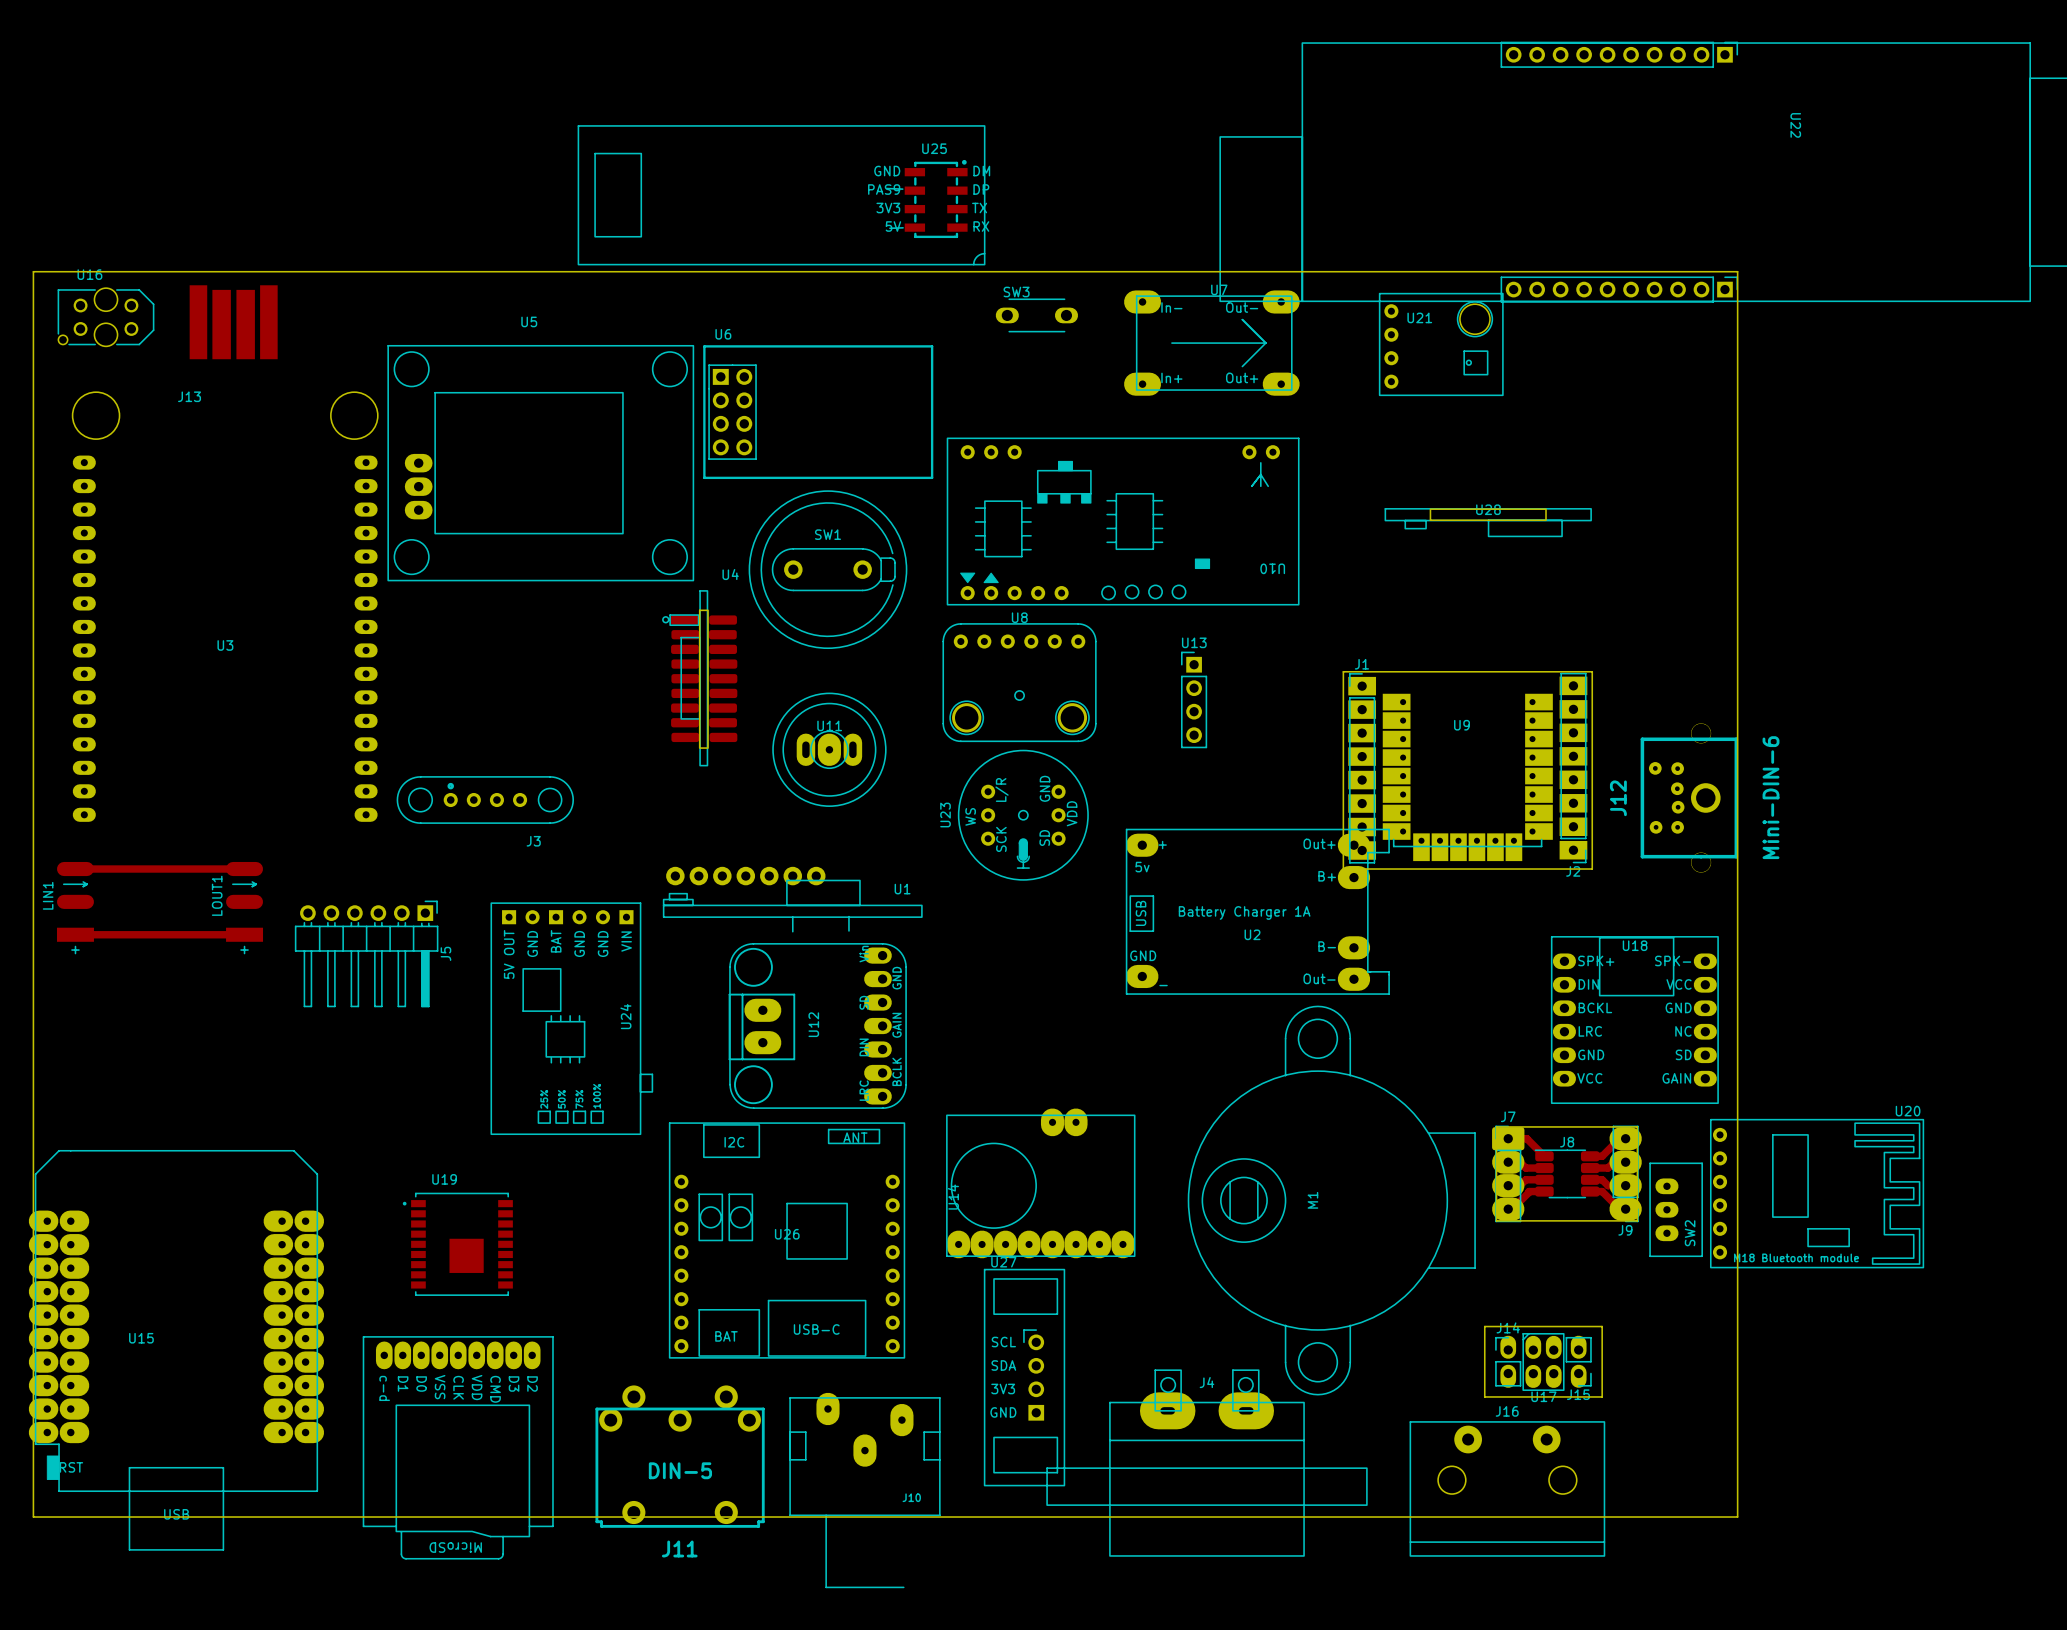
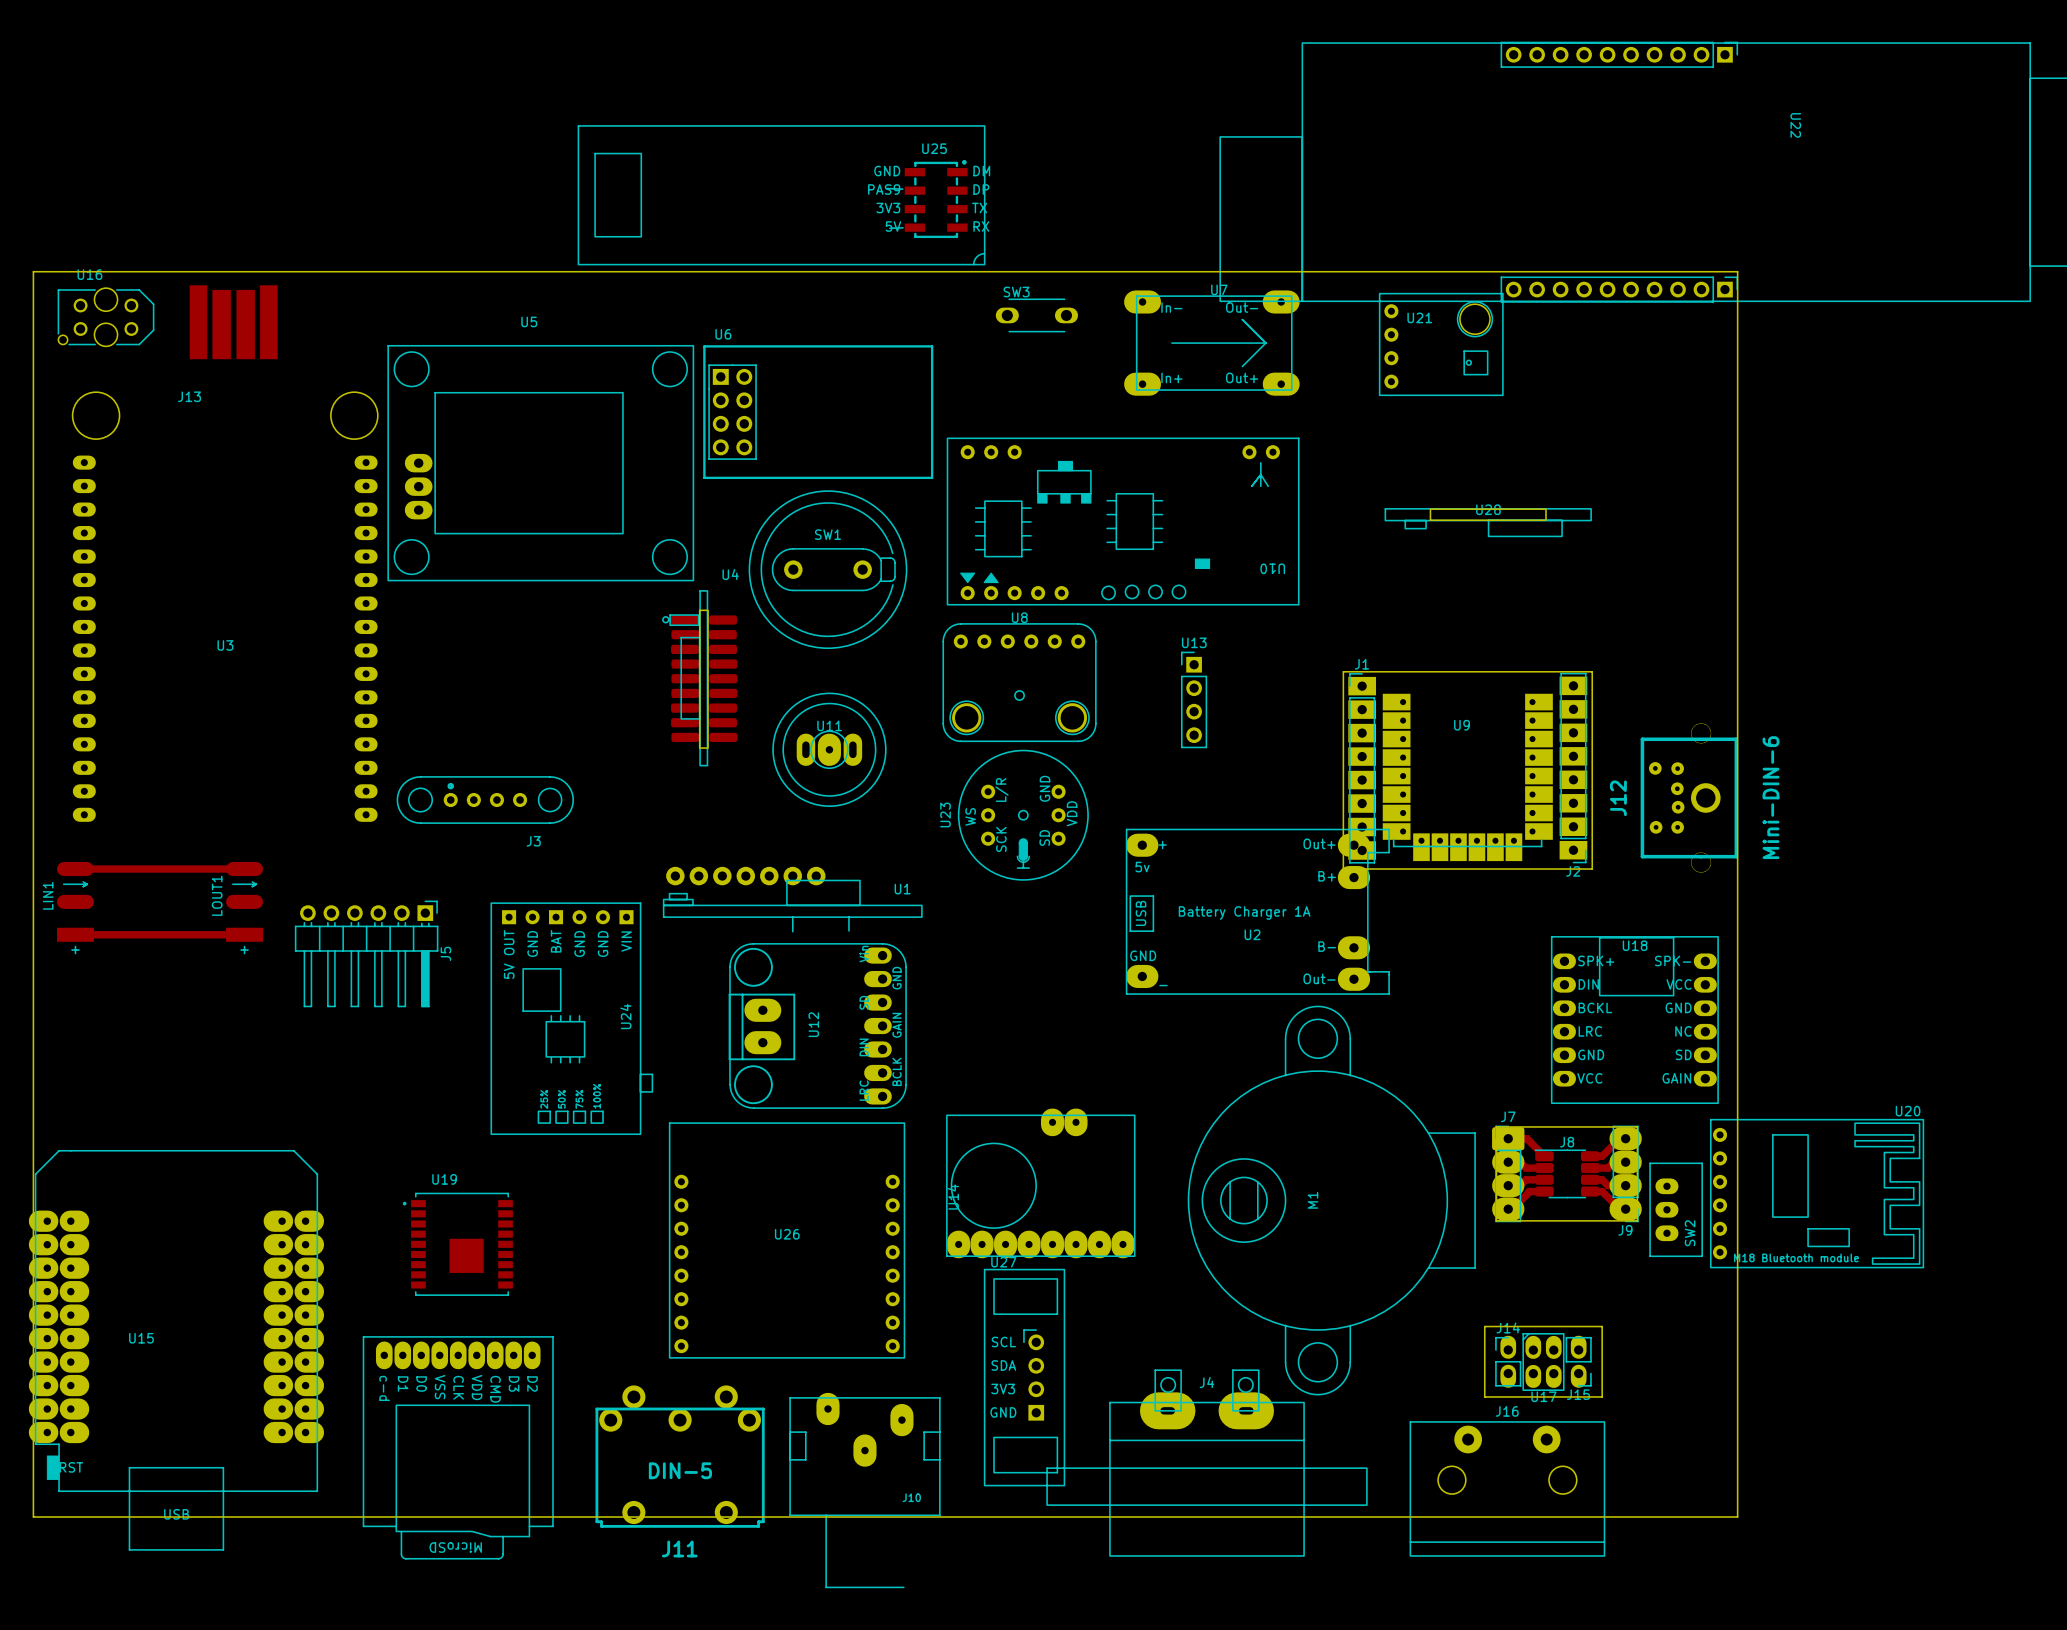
U26 footprint: [669, 1122, 905, 1359] -> [669, 1122, 905, 1359]

